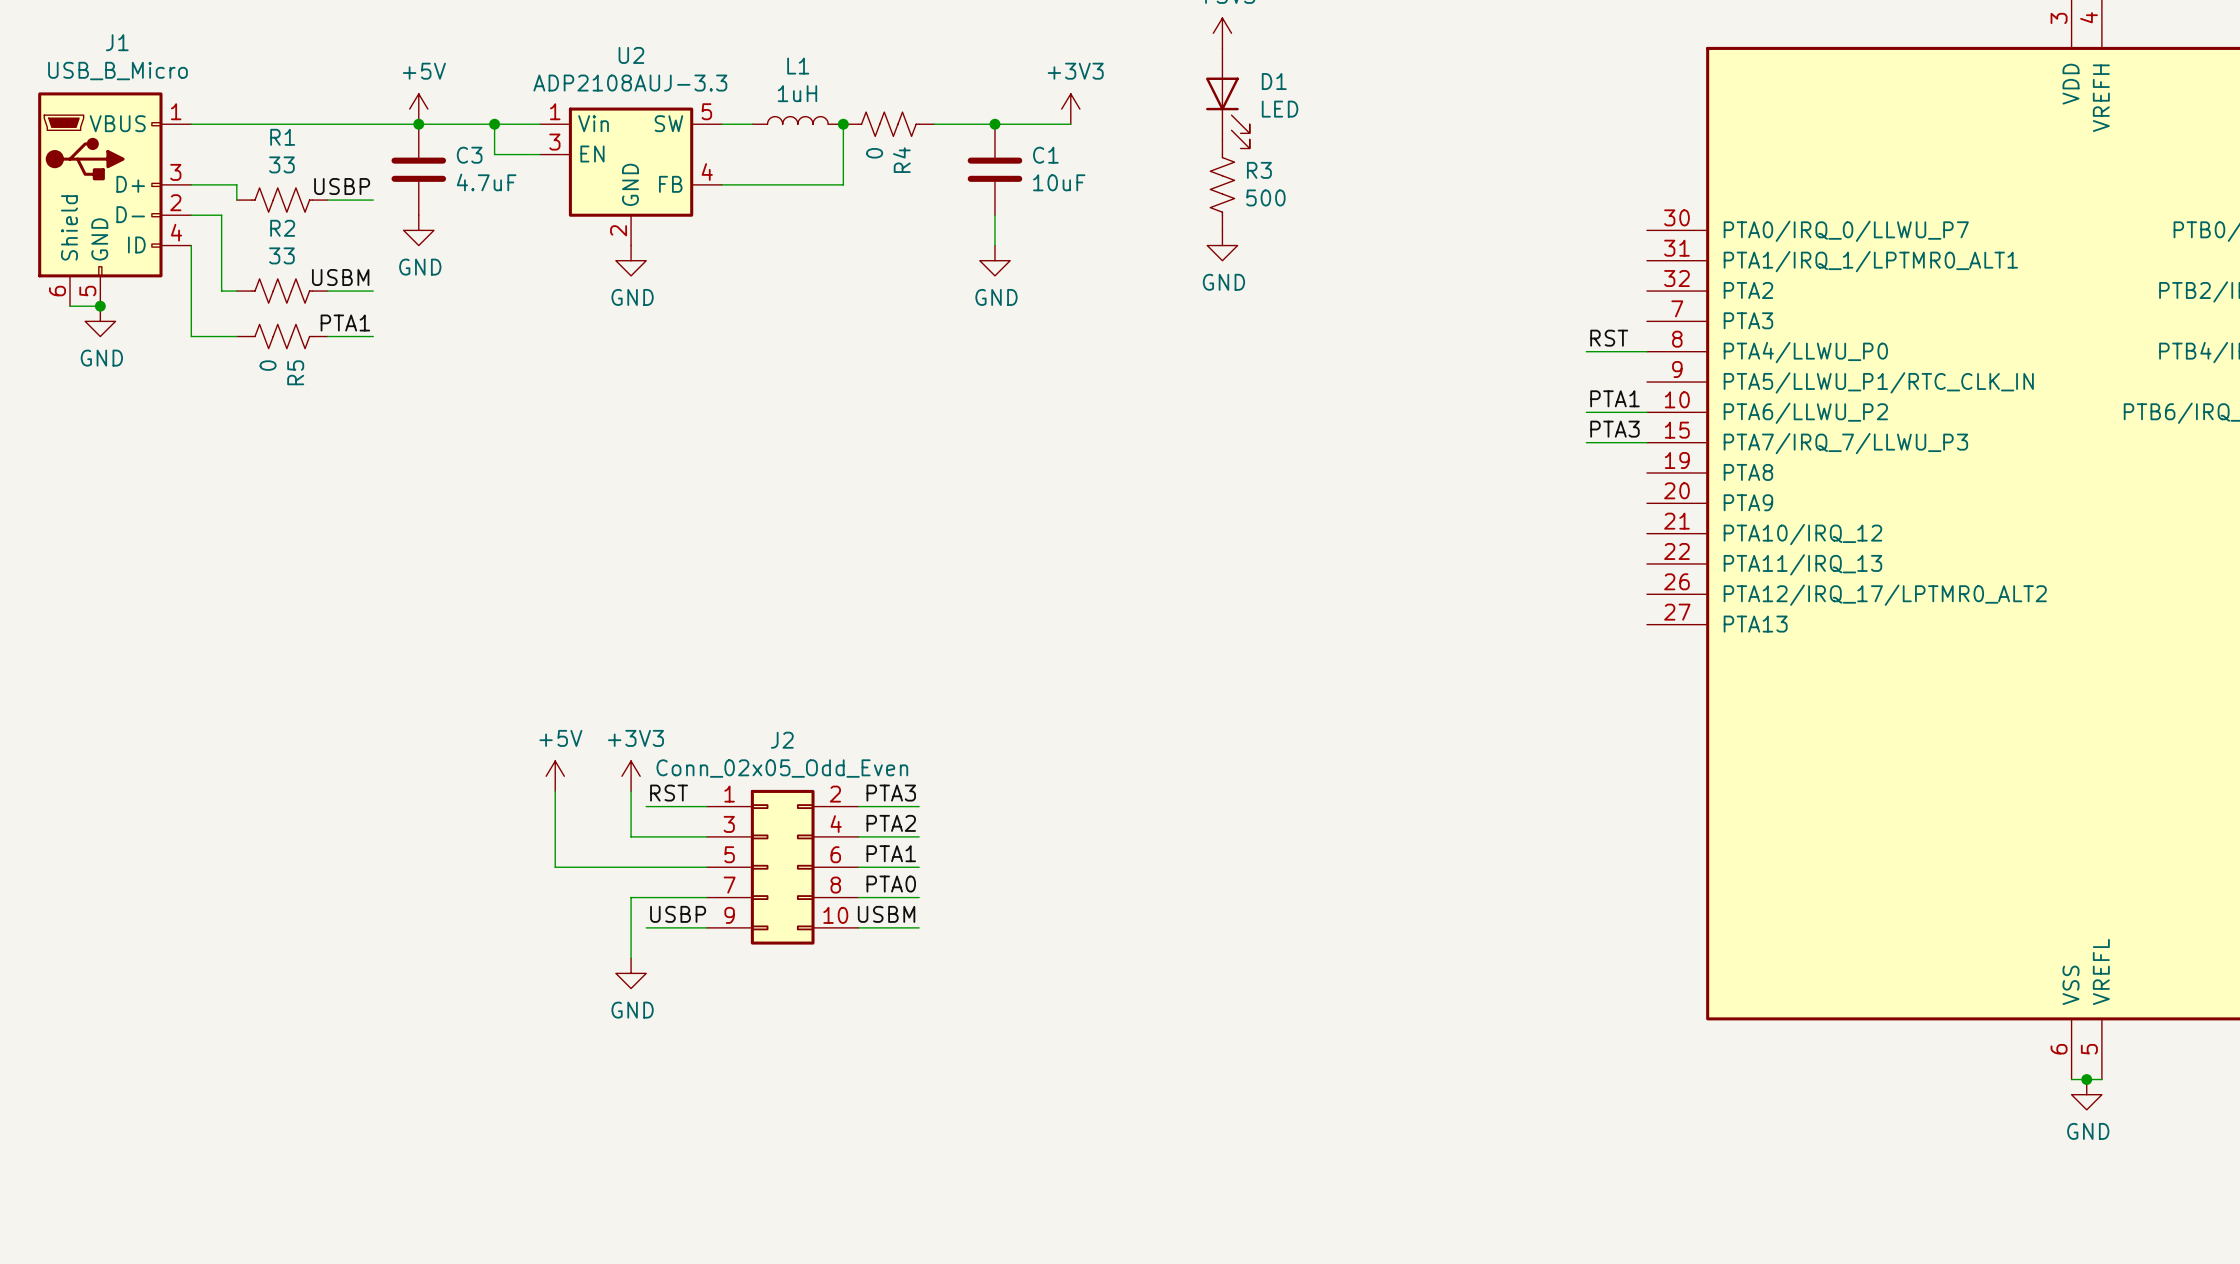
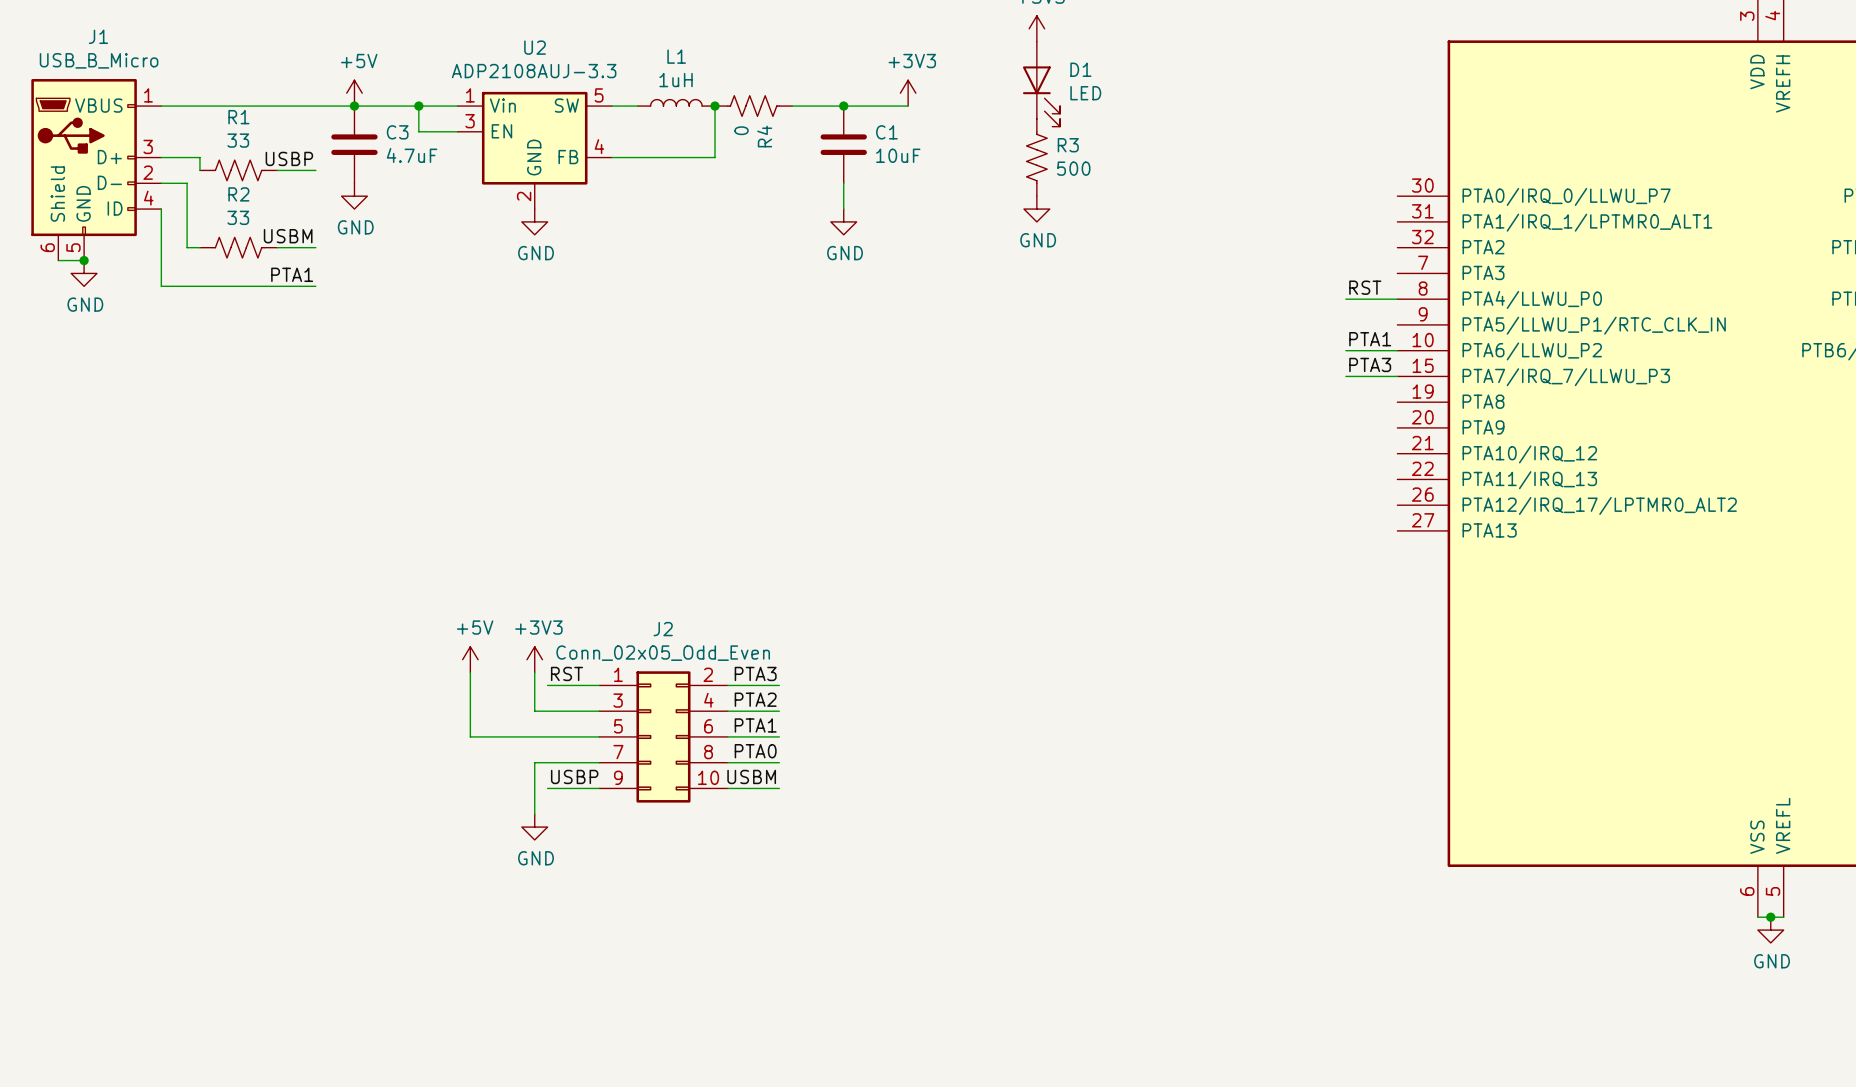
R5: 0 (282, 336) -> none

